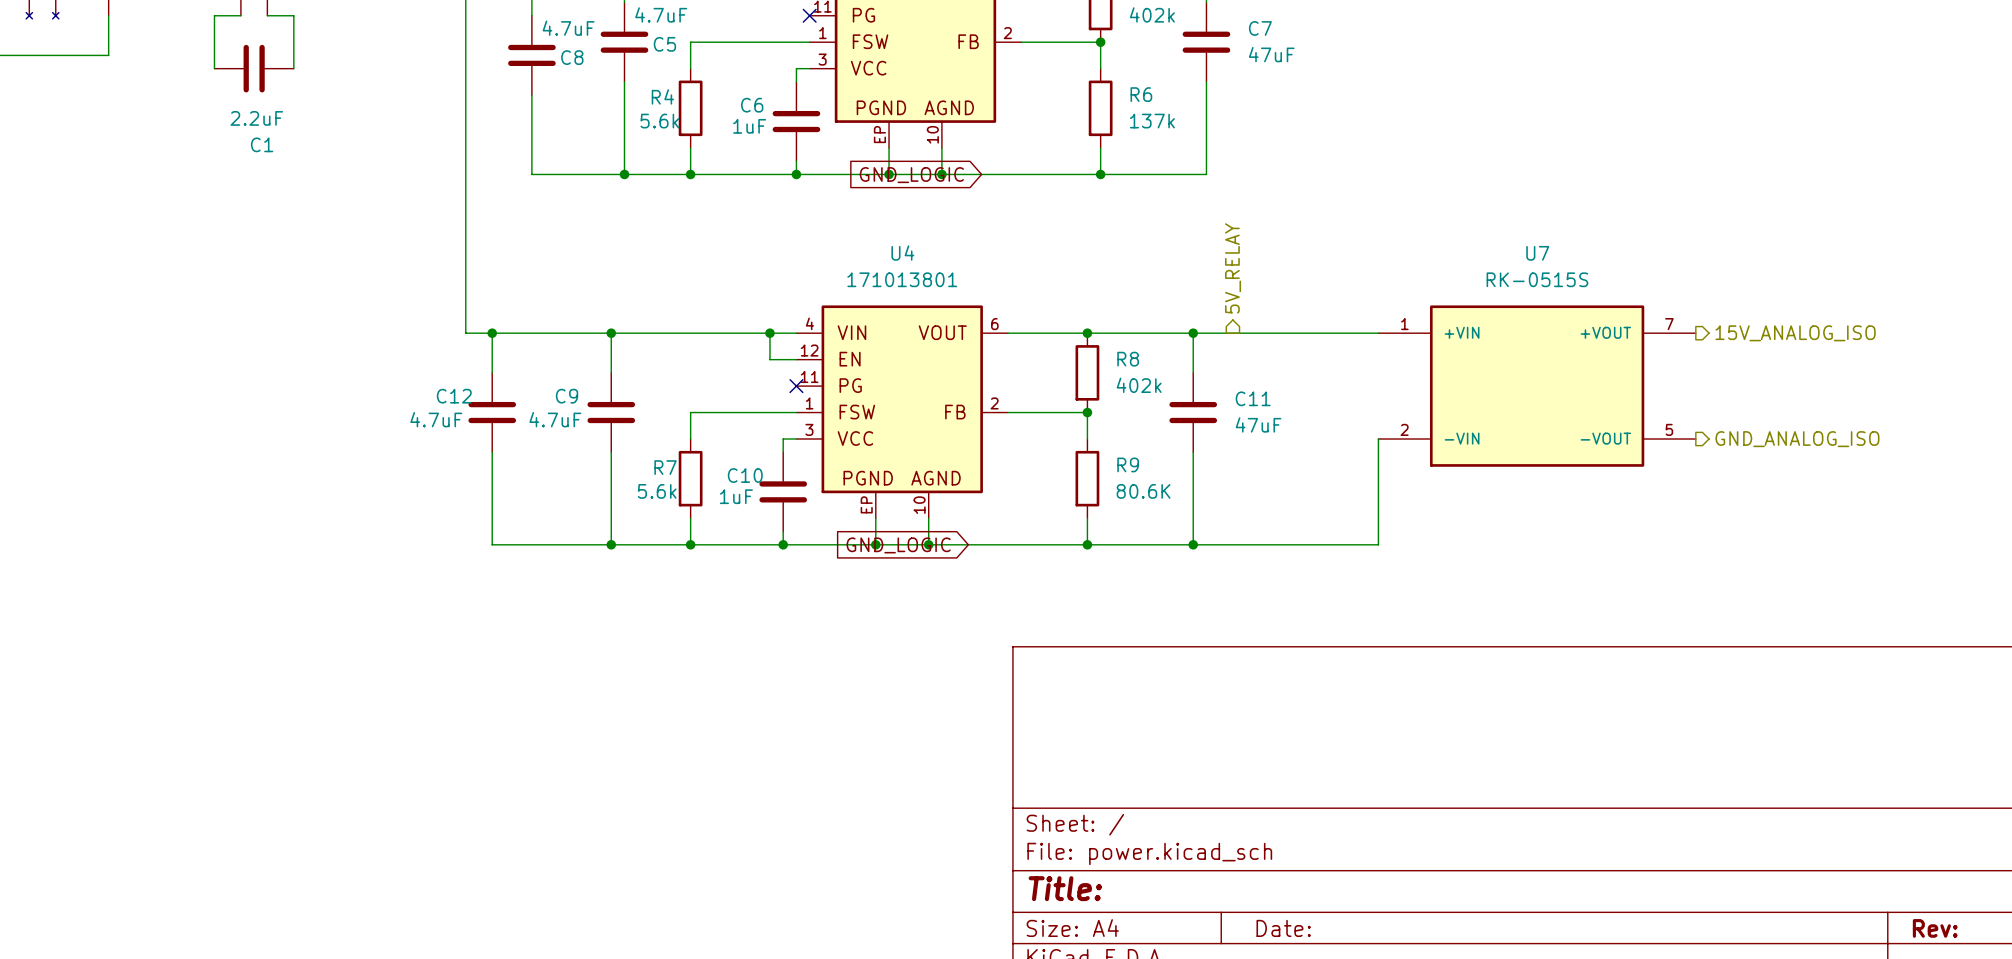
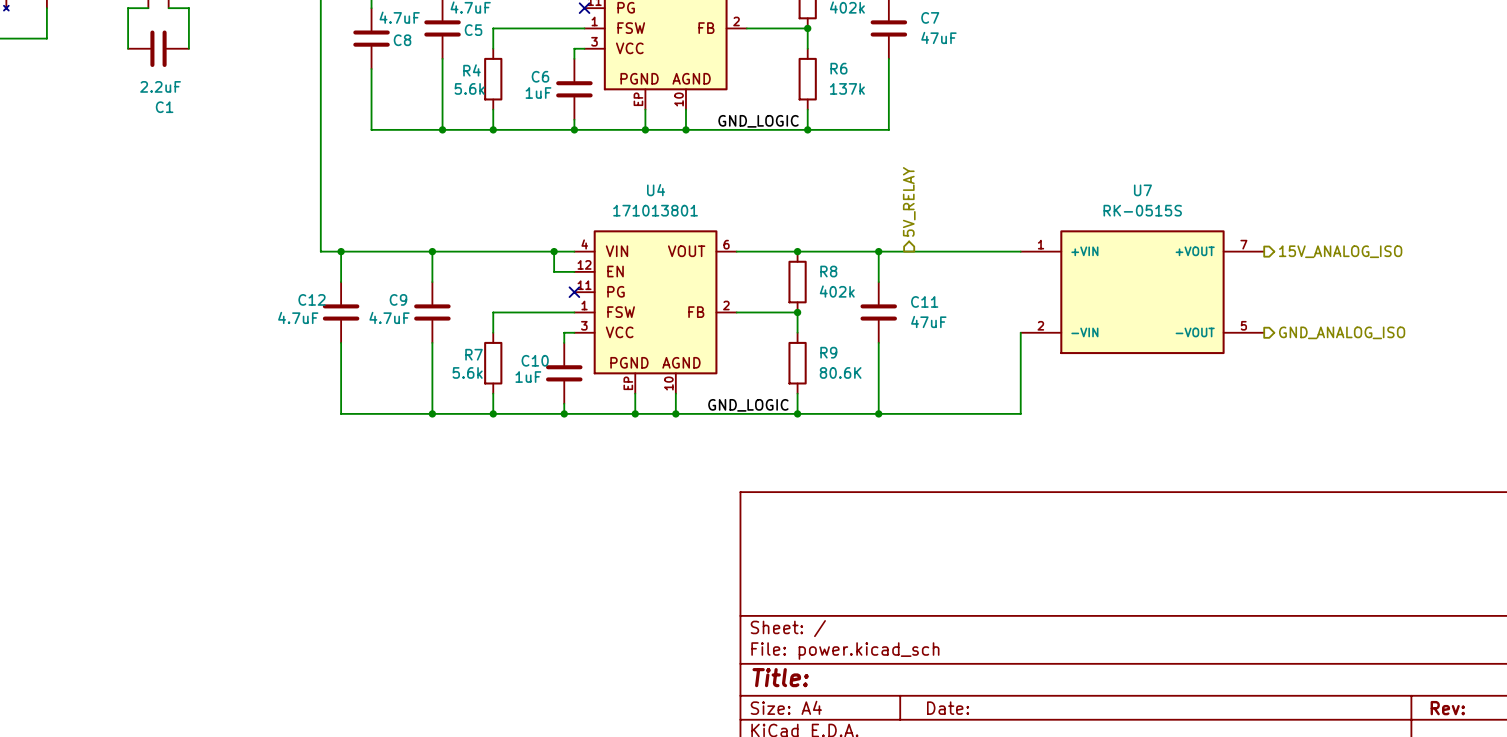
label: none -> GND_LOGIC (758, 121)
global label: GND_LOGIC (911, 175) -> none
label: none -> GND_LOGIC (748, 405)
global label: GND_LOGIC (898, 545) -> none

